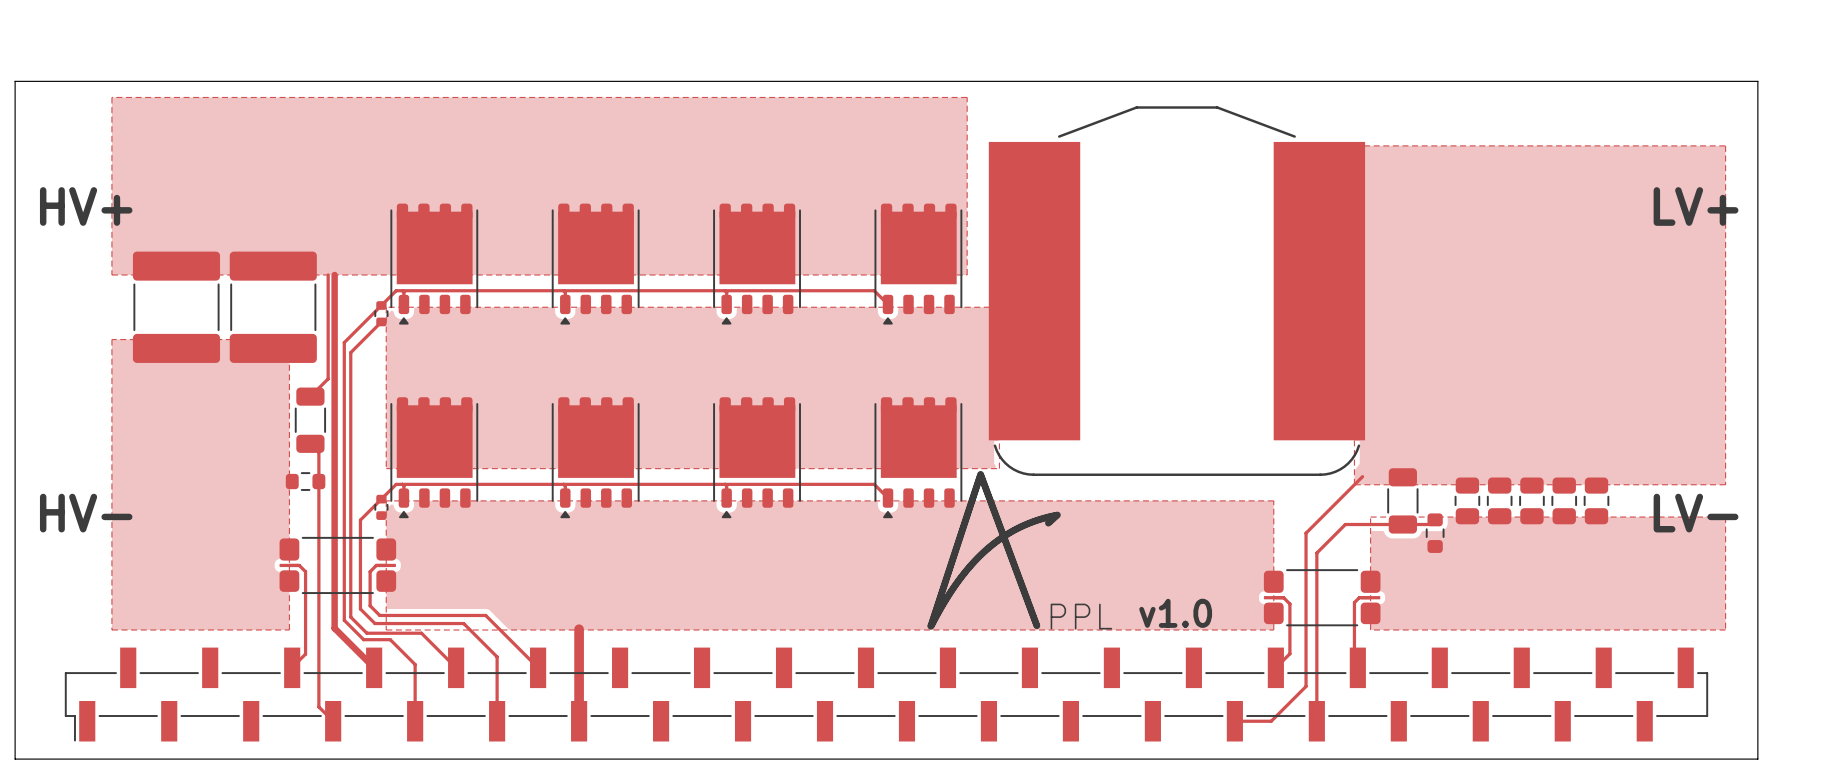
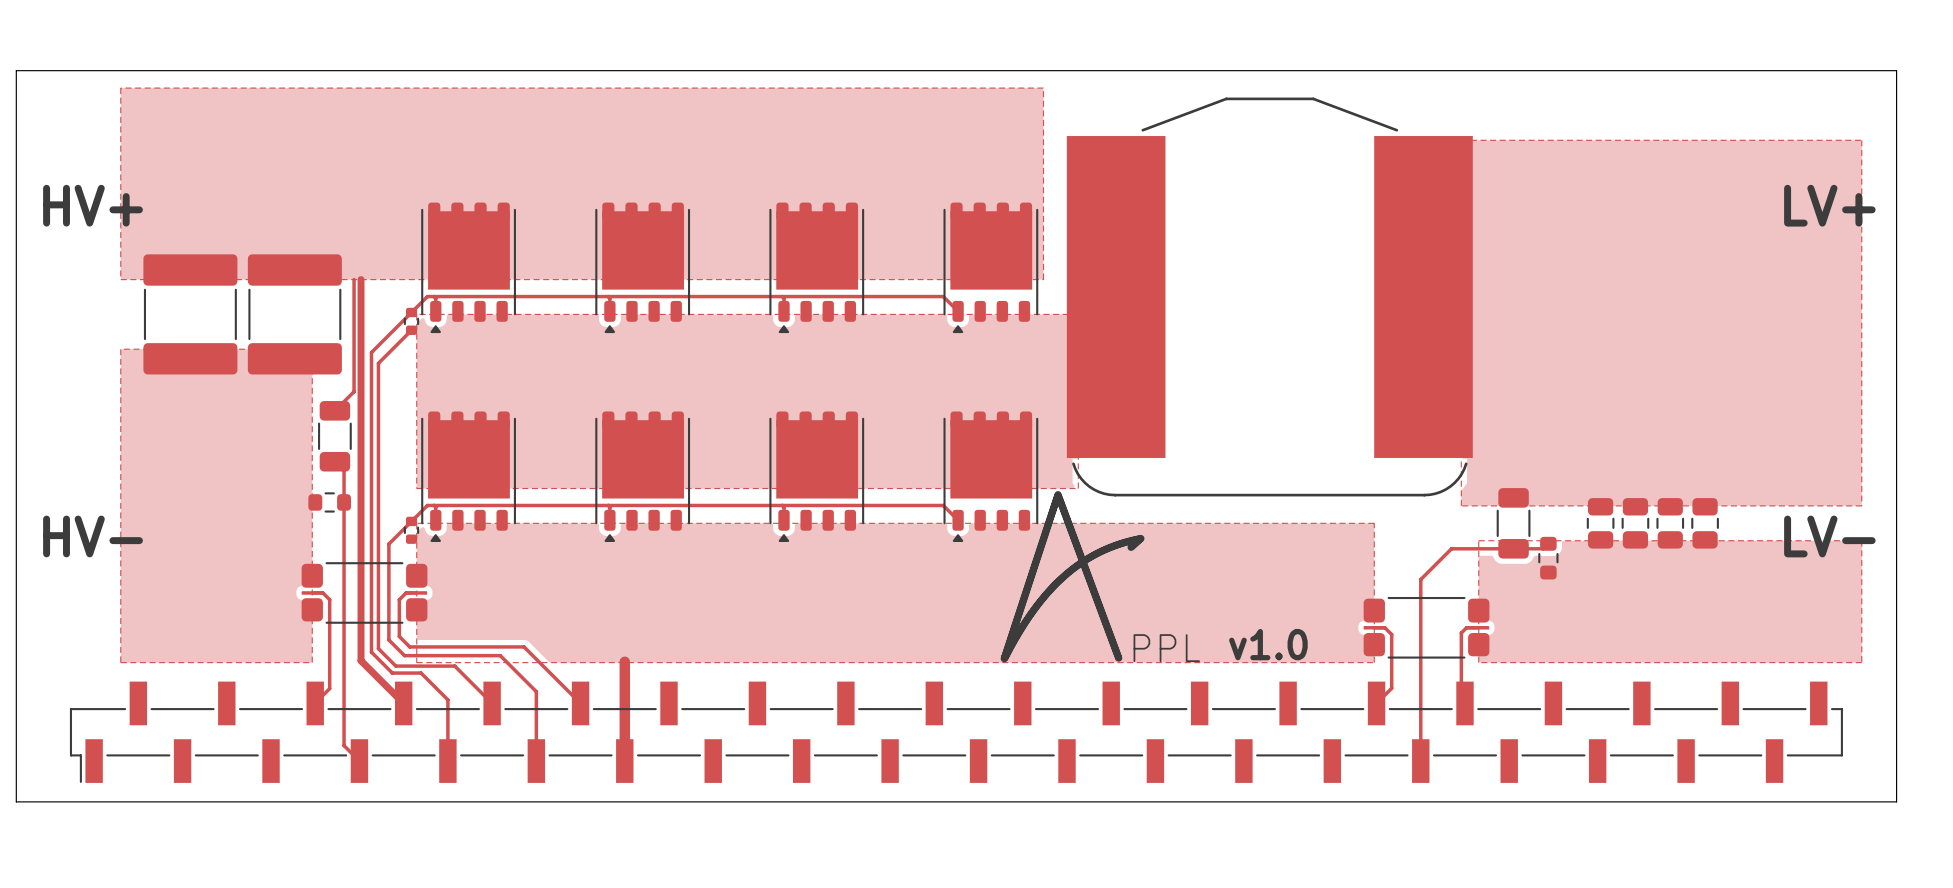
track: (1362, 476) (1306, 533) (1306, 686) (1271, 721) (1234, 721) -> none
part: (1467, 500) -> none
part: none -> (1600, 523)
part: (1499, 500) -> none
part: none -> (1635, 523)
part: (1531, 500) -> none
part: none -> (1670, 523)
part: (1564, 500) -> none
part: none -> (1705, 523)
part: (1596, 500) -> none

